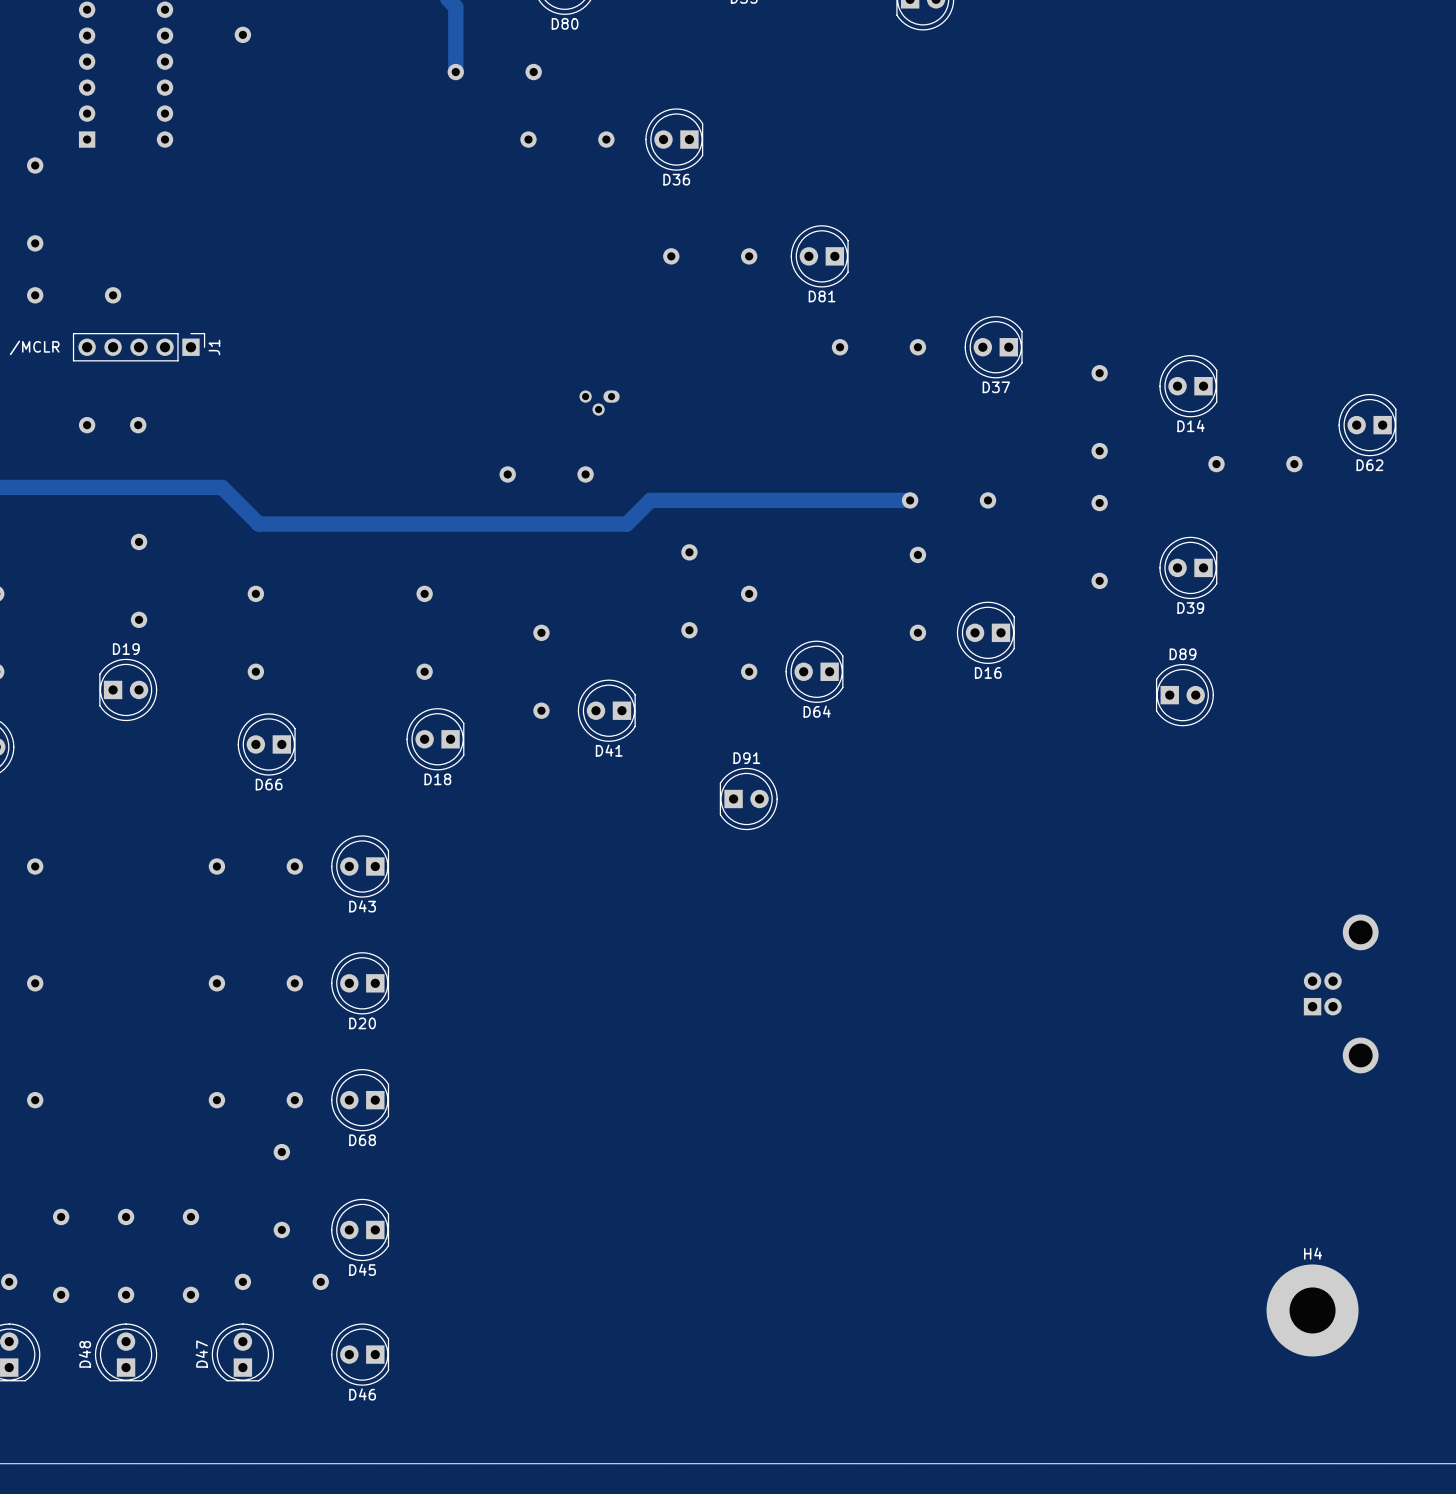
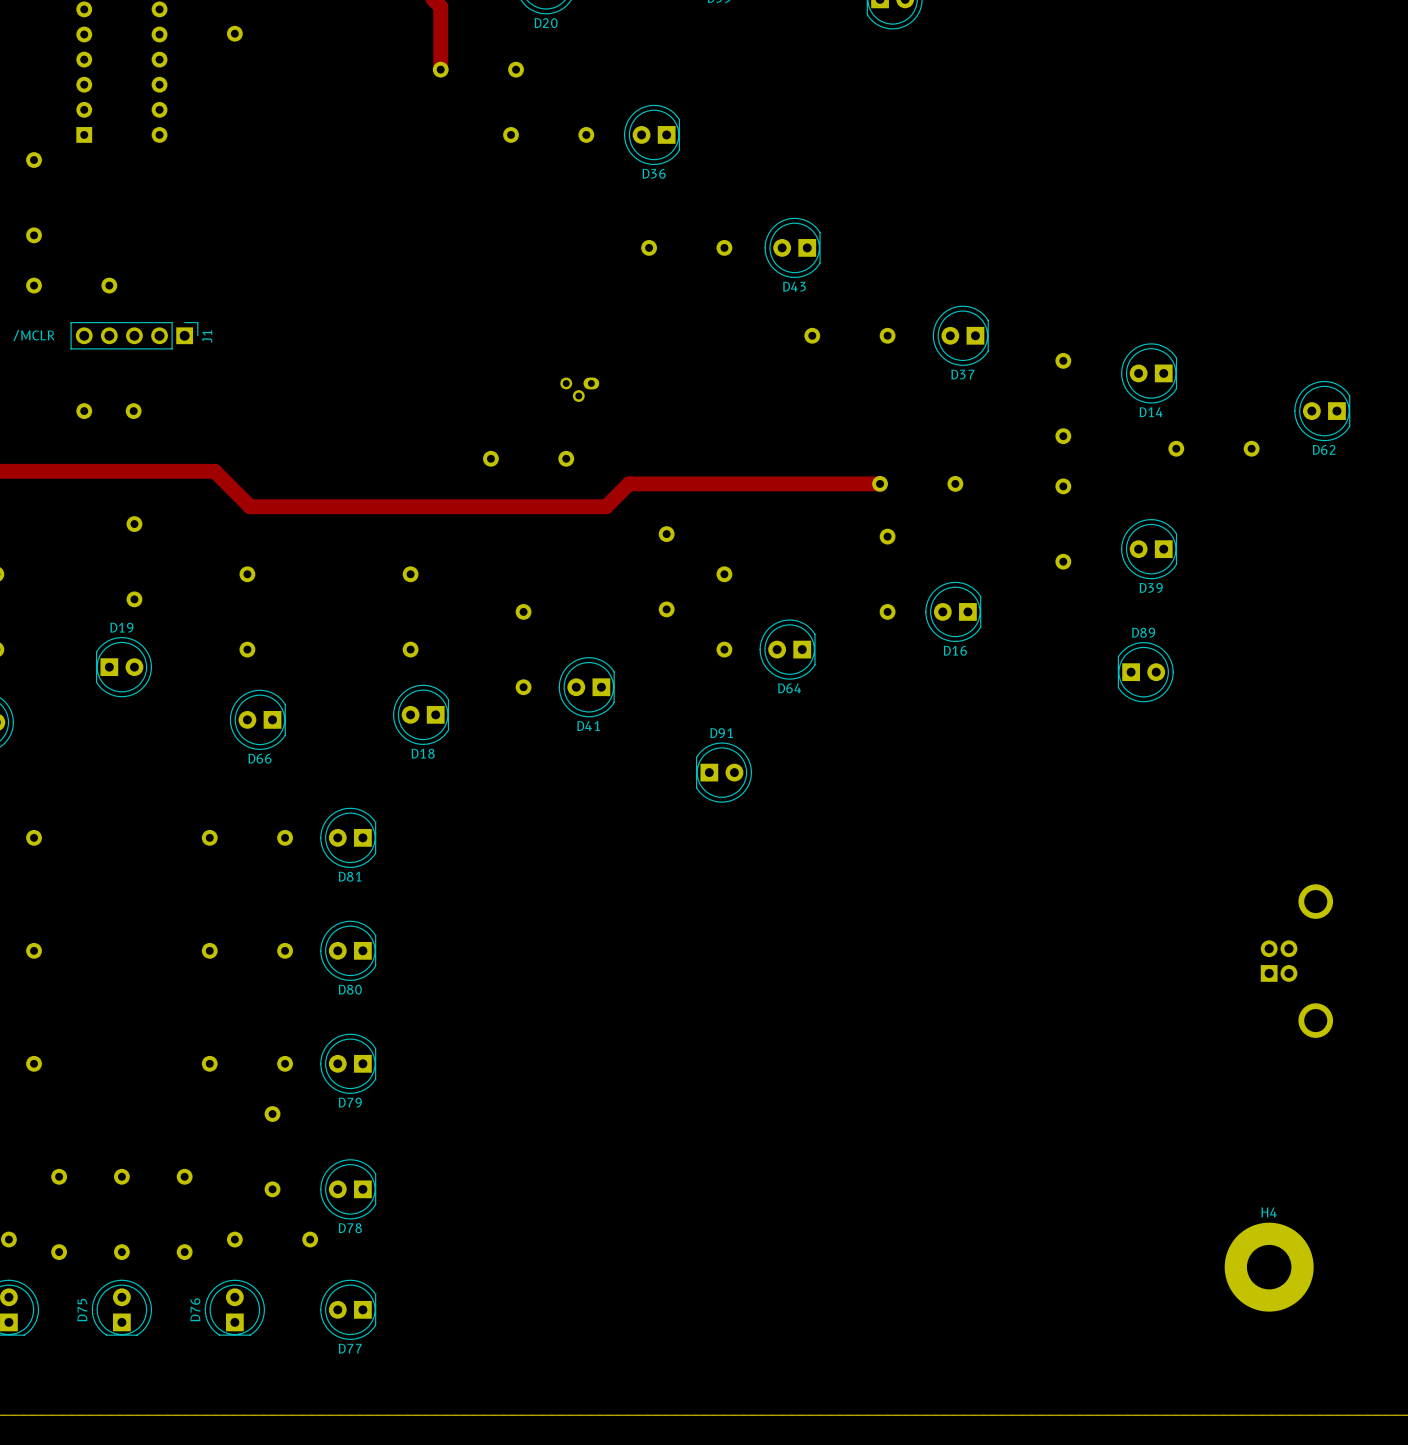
D80 name: D80 (565, 23) -> D20 (546, 23)
D81 name: D81 (822, 296) -> D43 (794, 286)
D43 name: D43 (362, 906) -> D81 (350, 876)
D20 name: D20 (362, 1023) -> D80 (350, 989)
D68 name: D68 (362, 1140) -> D79 (350, 1102)
D45 name: D45 (362, 1269) -> D78 (350, 1228)
D48 name: D48 (84, 1354) -> D75 (82, 1310)
D47 name: D47 (201, 1354) -> D76 (195, 1309)
D46 name: D46 (362, 1394) -> D77 (350, 1348)

